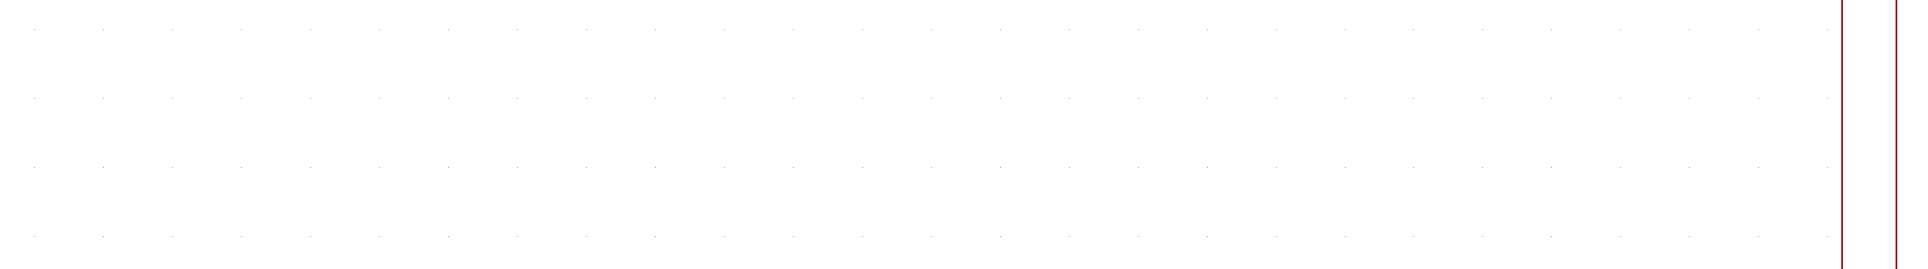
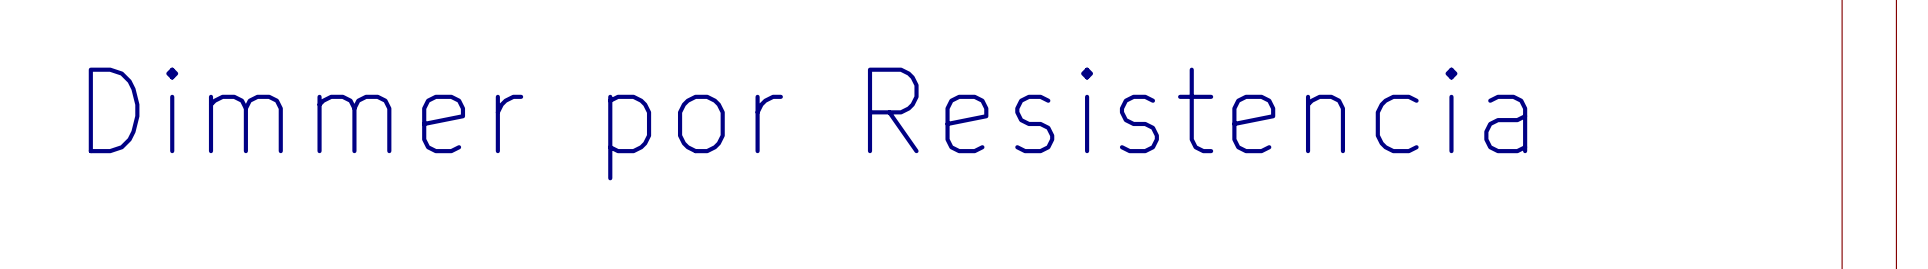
text: none -> Dimmer por Resistencia (807, 123)

